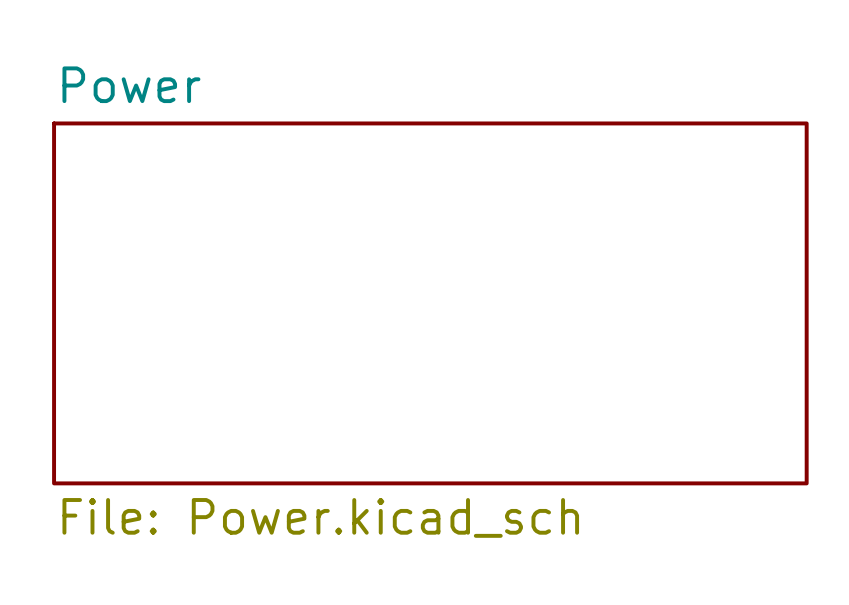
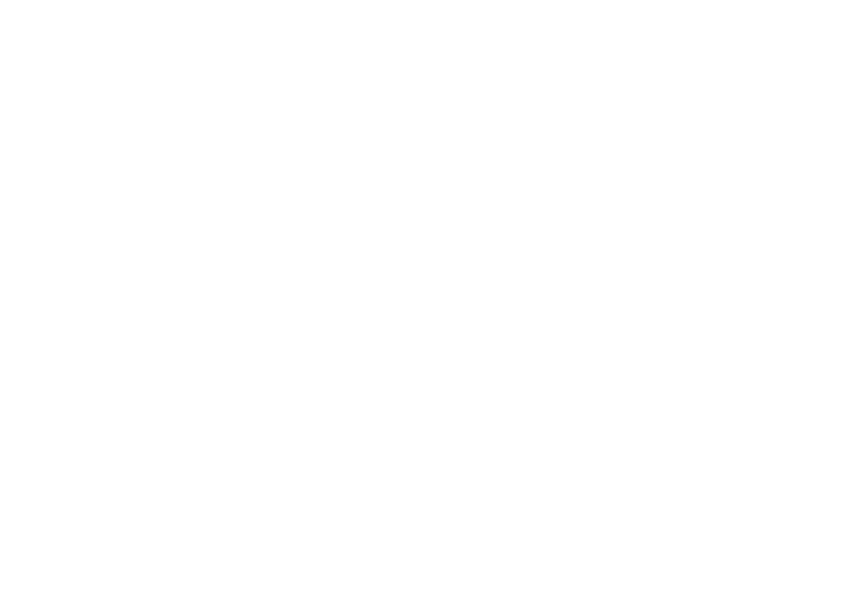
sheet Power: File: Power.kicad_sch (430, 303) -> none

